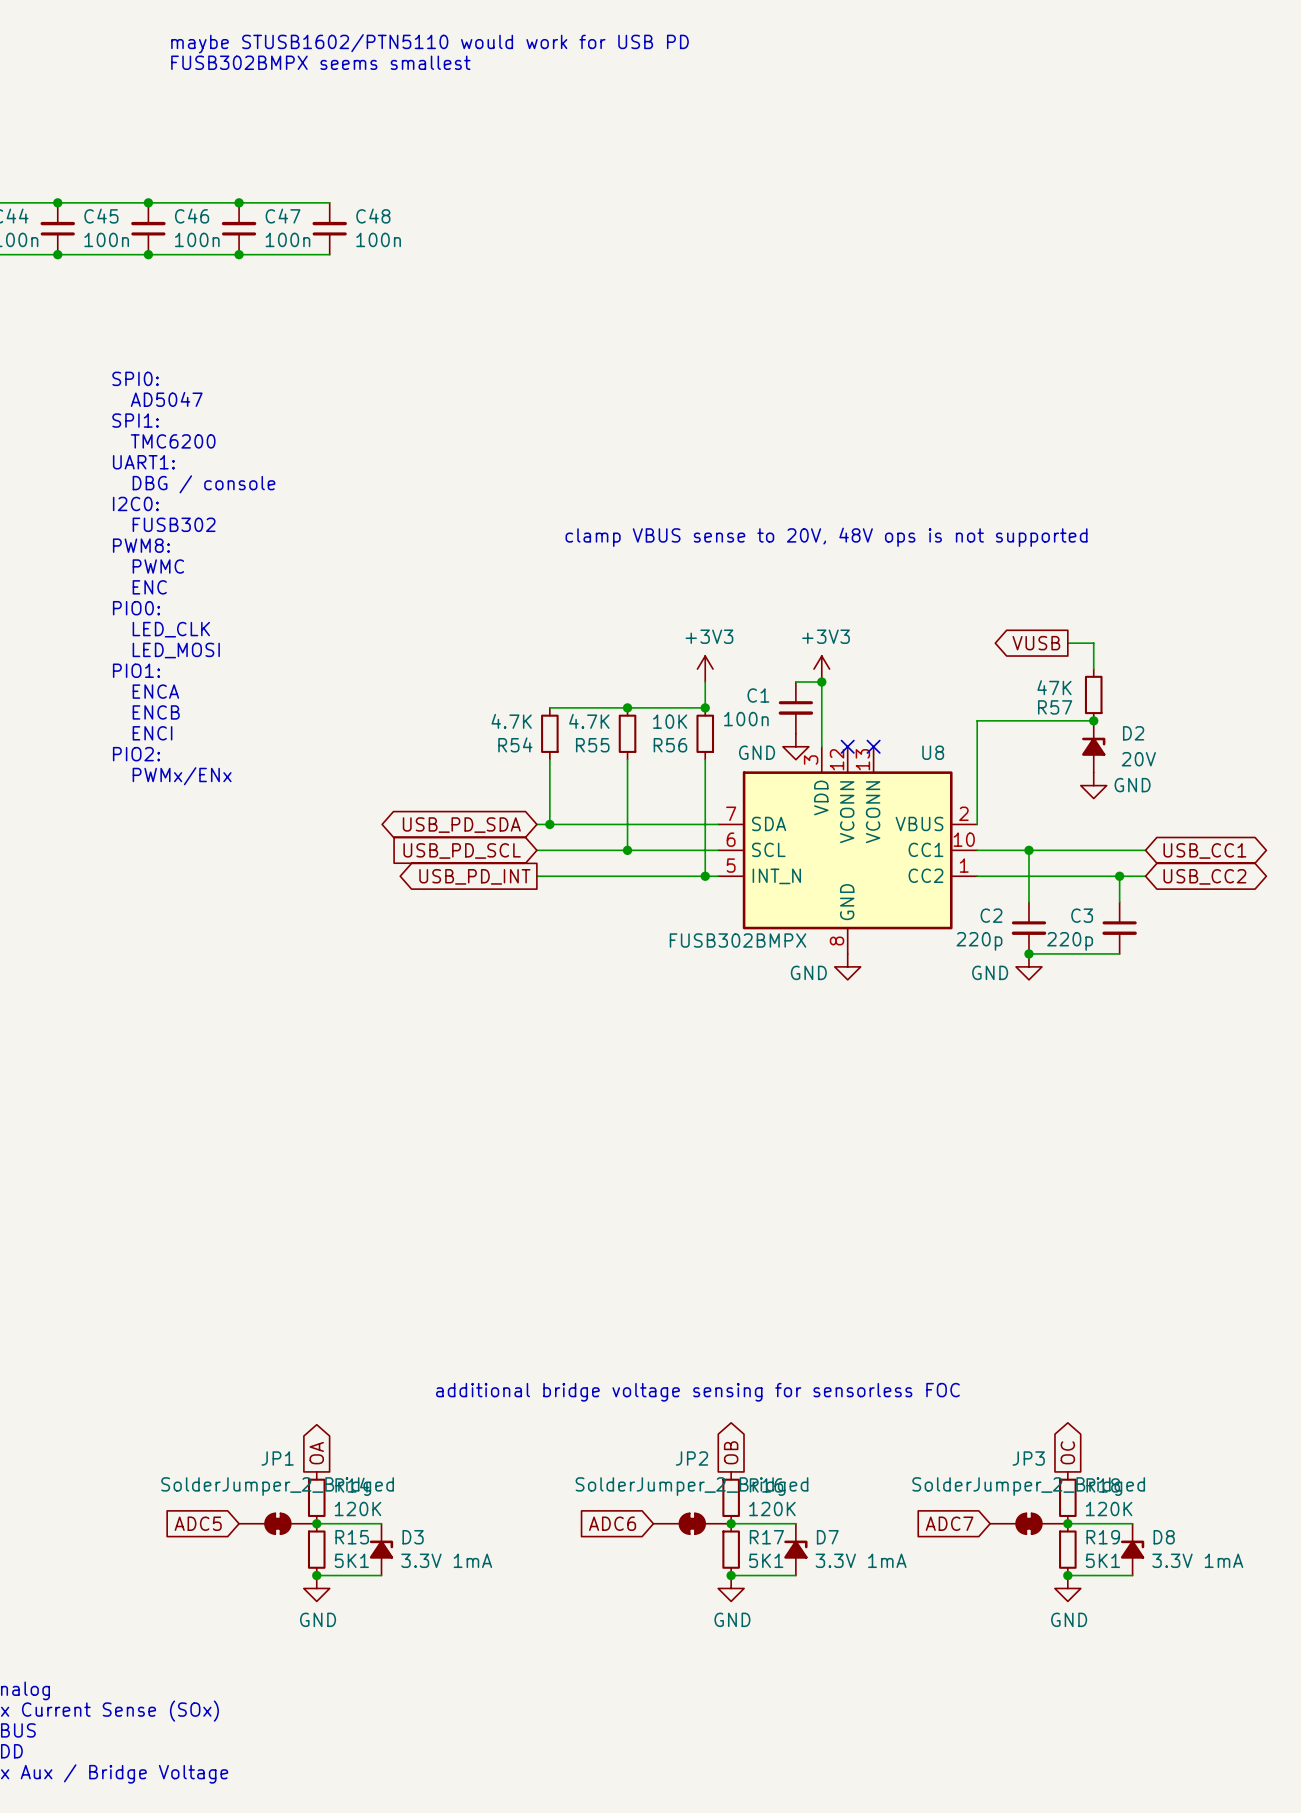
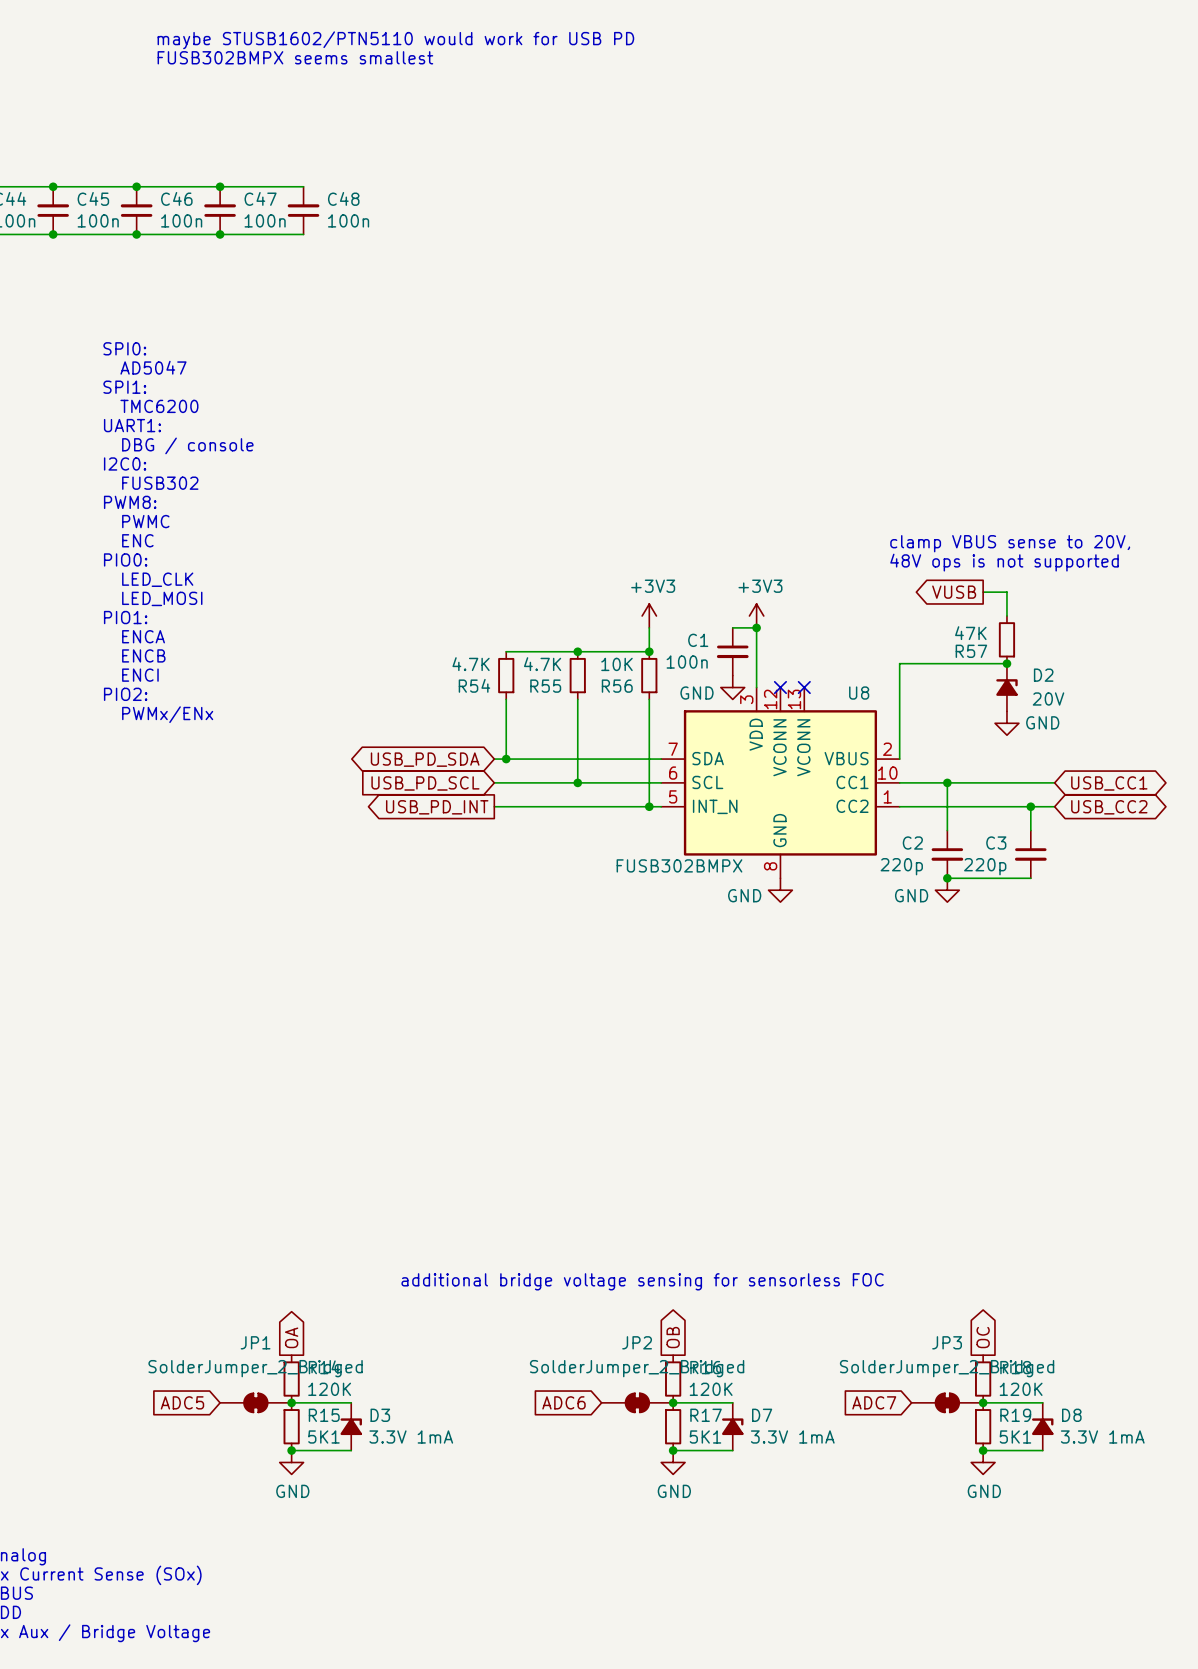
text: clamp VBUS sense to 20V, 48V ops is not supported (826, 537) -> none
text: none -> clamp VBUS sense to 20V, (1010, 543)
text: none -> 48V ops is not supported (1004, 562)

